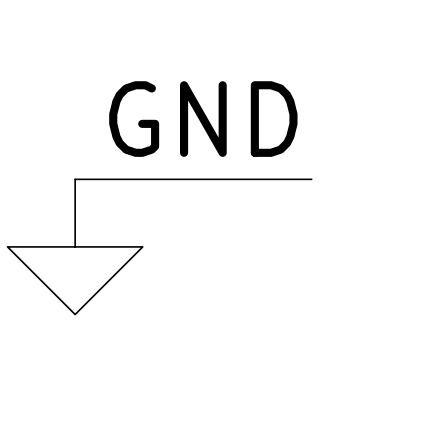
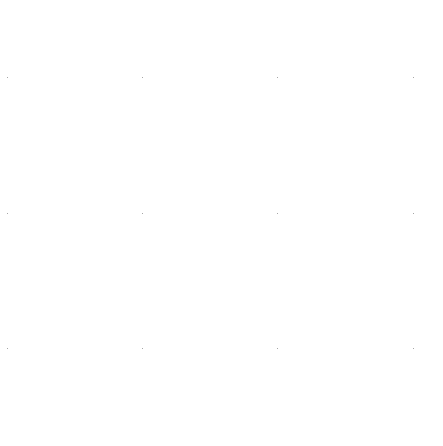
label: GND (203, 119) -> none
wire: (75, 179) (311, 179) -> none
power symbol: (75, 246) -> none

